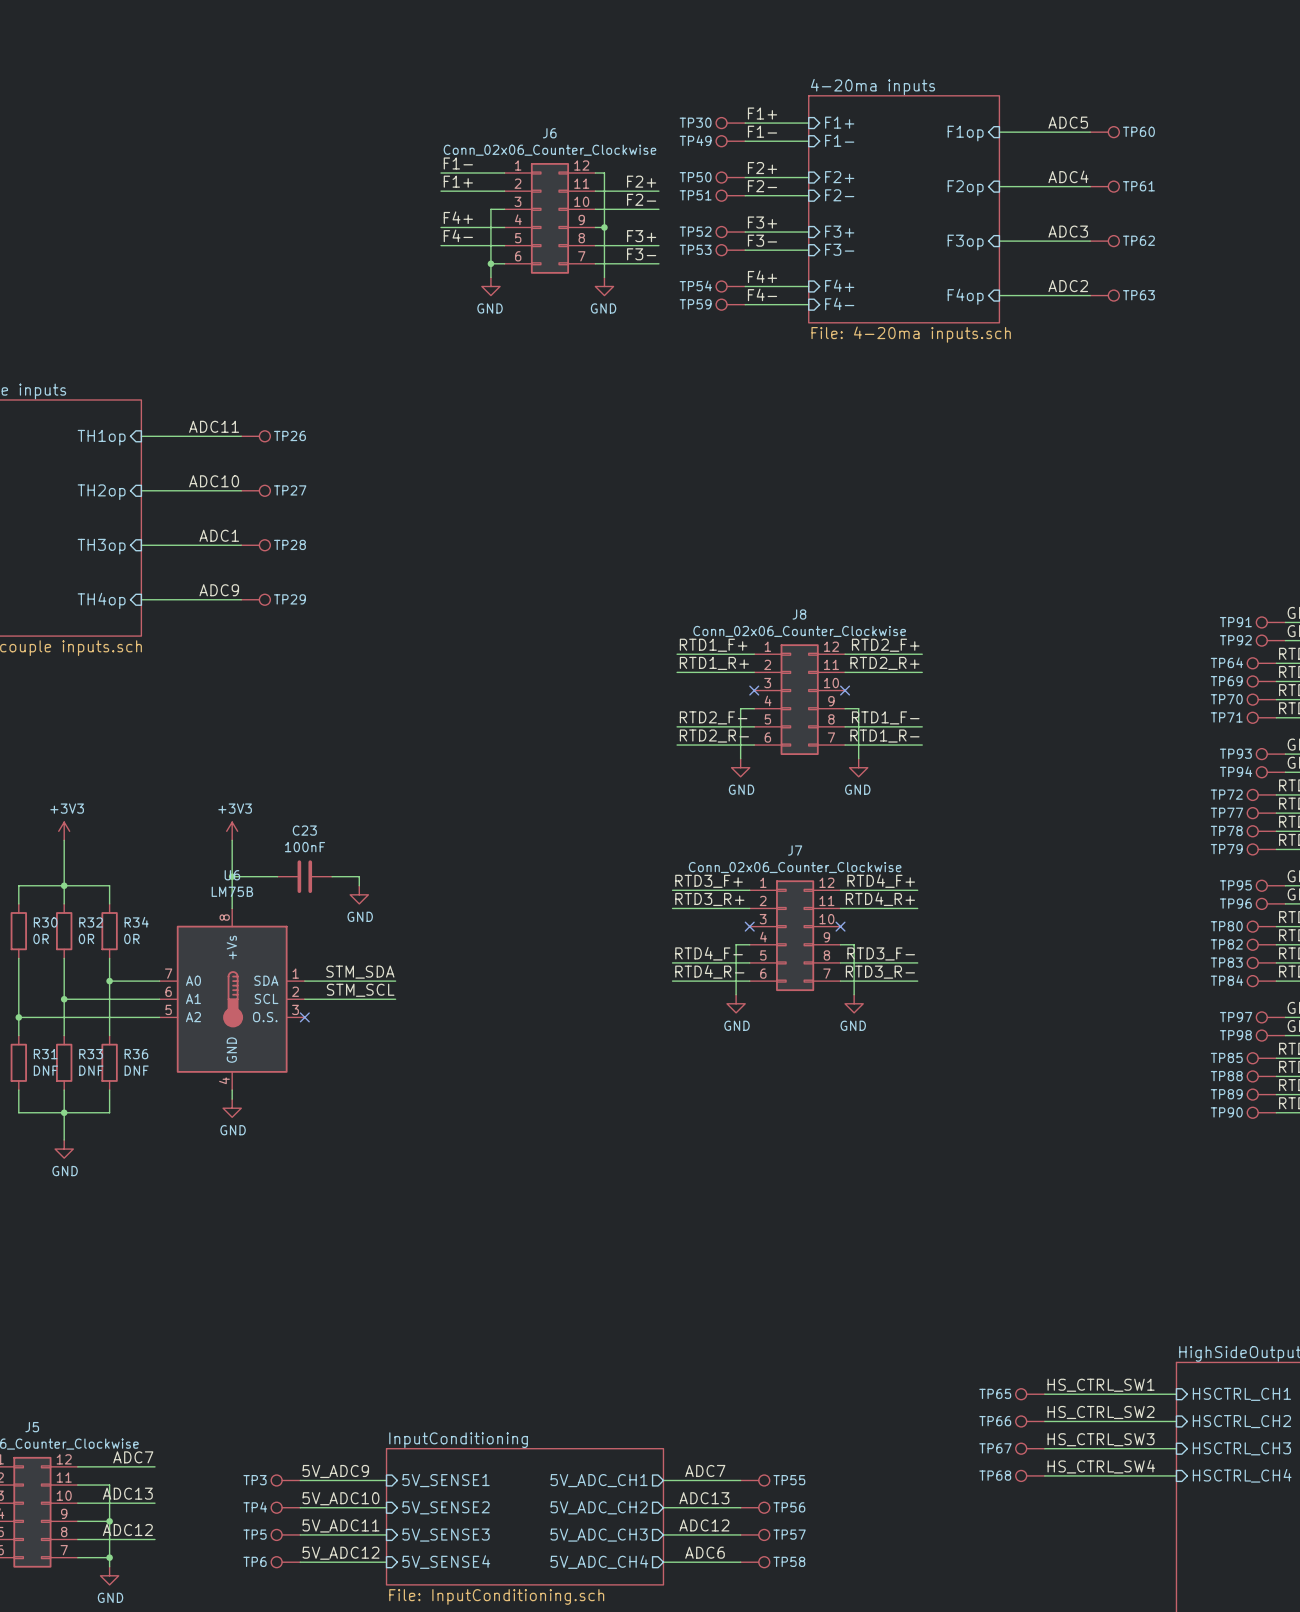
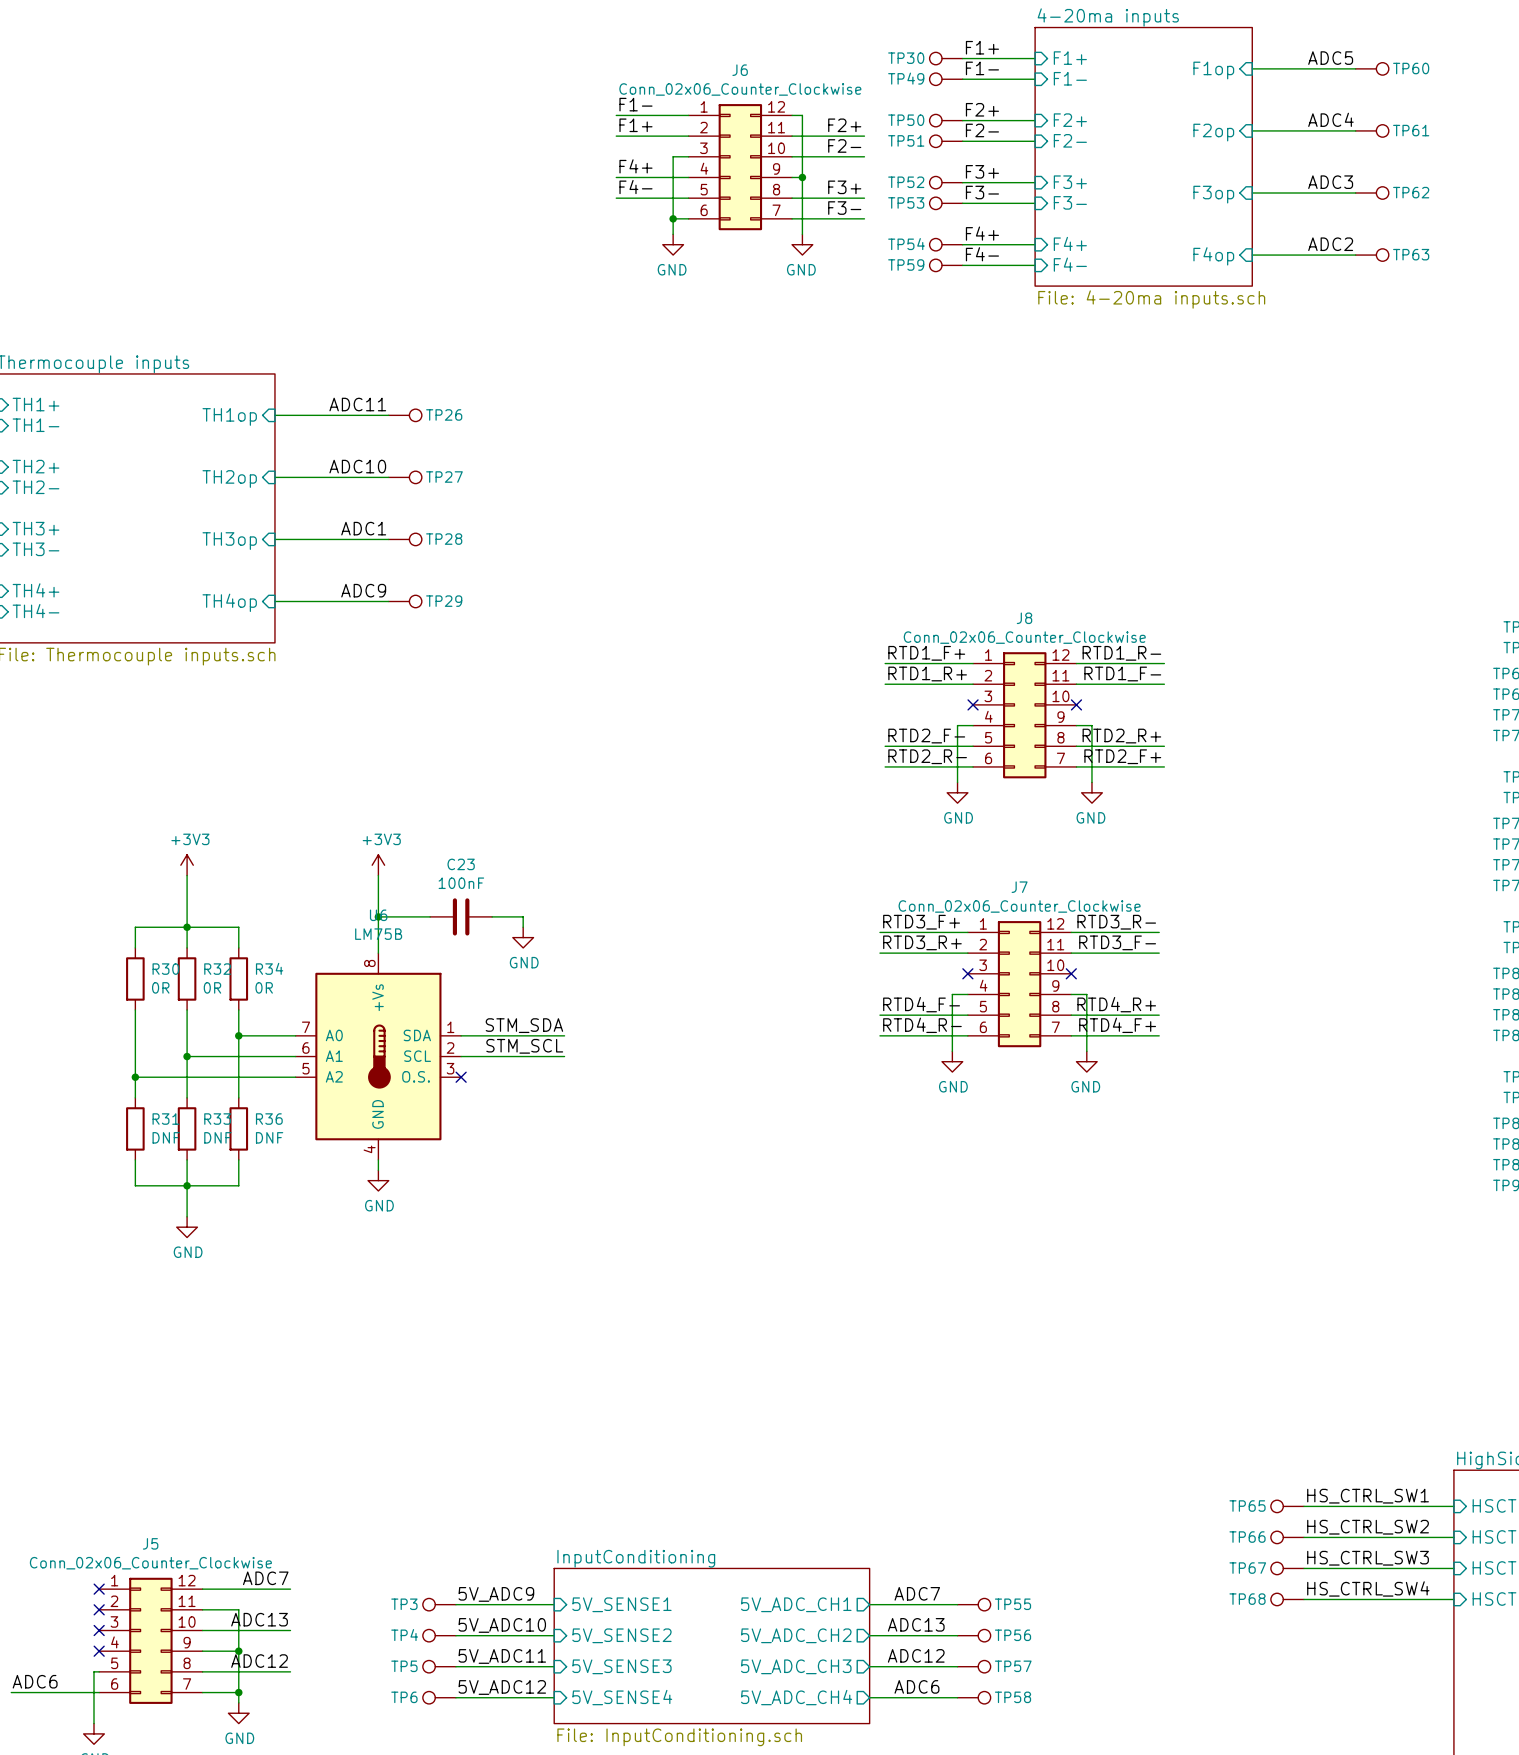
label: RTD2_F+ (885, 645) -> RTD1_R- (1121, 653)
label: RTD2_R+ (884, 663) -> RTD1_F- (1122, 674)
label: RTD1_F- (885, 717) -> RTD2_R+ (1121, 736)
label: RTD1_R- (884, 736) -> RTD2_F+ (1122, 756)
label: RTD4_F+ (881, 881) -> RTD3_R- (1116, 922)
label: RTD4_R+ (880, 899) -> RTD3_F- (1117, 942)
label: RTD3_F- (881, 953) -> RTD4_R+ (1116, 1004)
label: RTD3_R- (880, 972) -> RTD4_F+ (1117, 1025)

